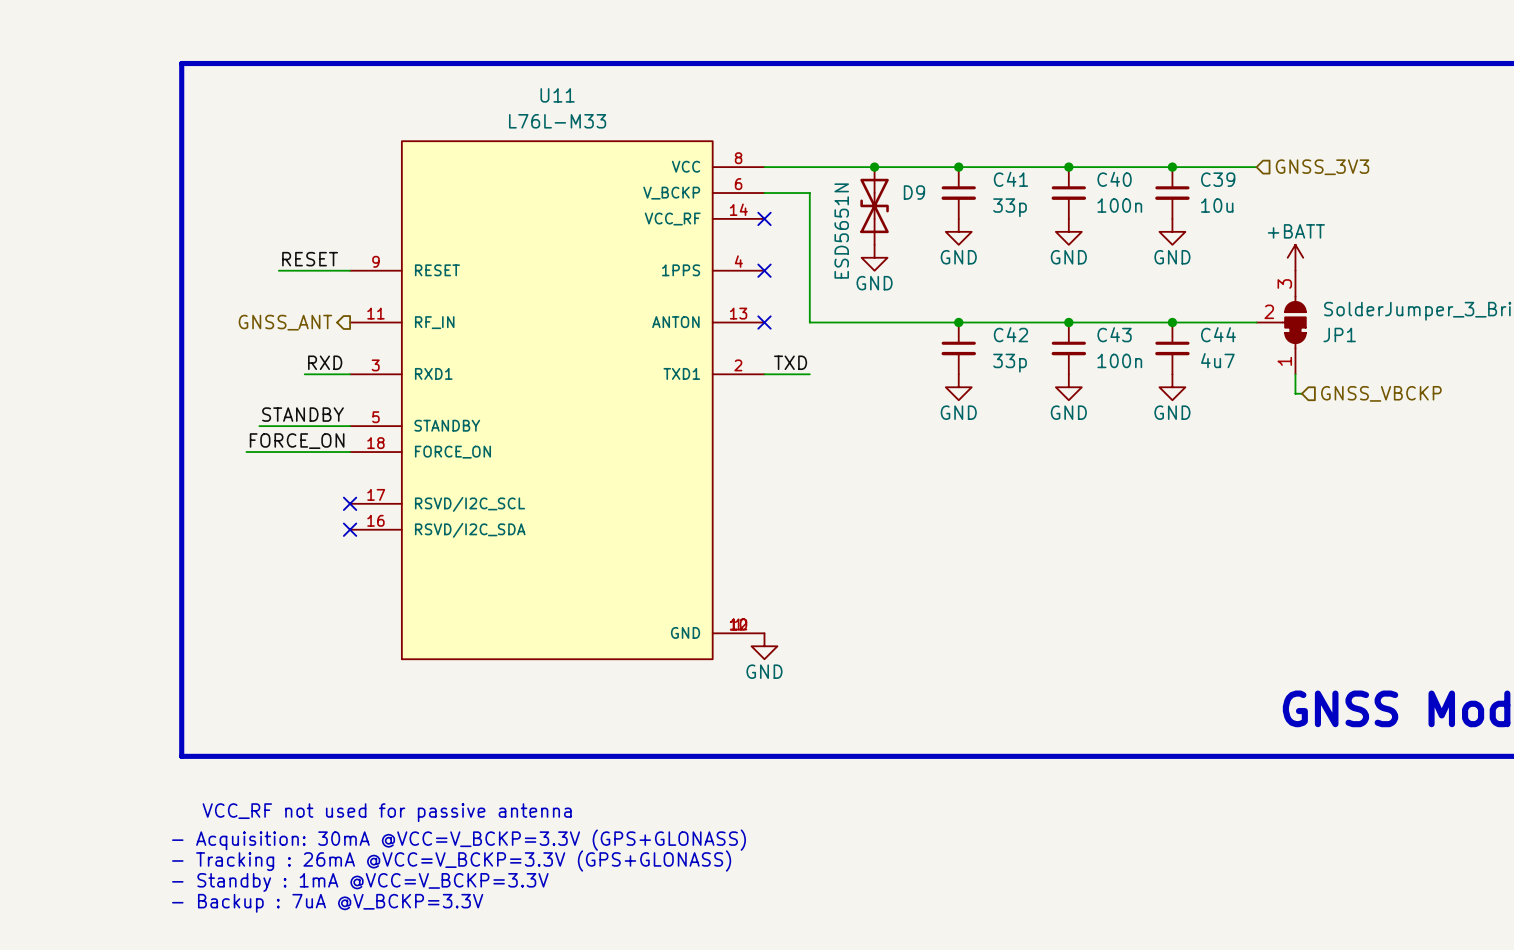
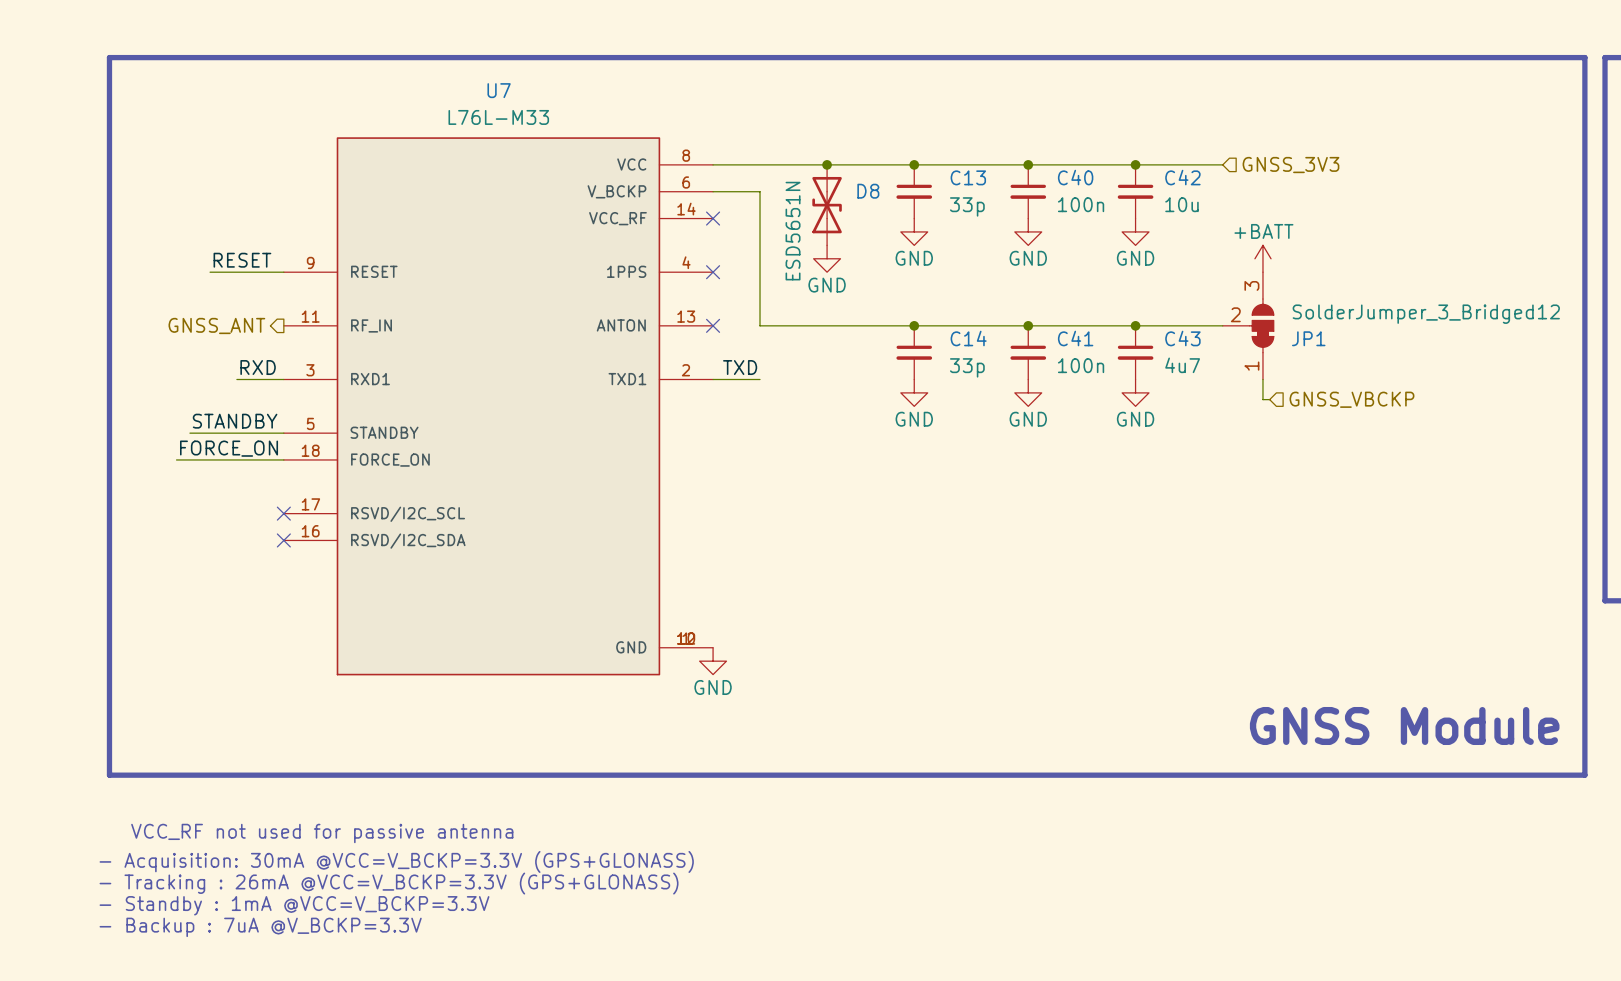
U11 name: U11 (557, 95) -> U7 (499, 90)
C41 name: C41 (1010, 179) -> C13 (968, 177)
C39 name: C39 (1218, 179) -> C42 (1182, 177)
D9 name: D9 (914, 192) -> D8 (868, 191)
C42 name: C42 (1010, 334) -> C14 (968, 338)
C43 name: C43 (1114, 334) -> C41 (1075, 338)
C44 name: C44 (1218, 334) -> C43 (1182, 338)

